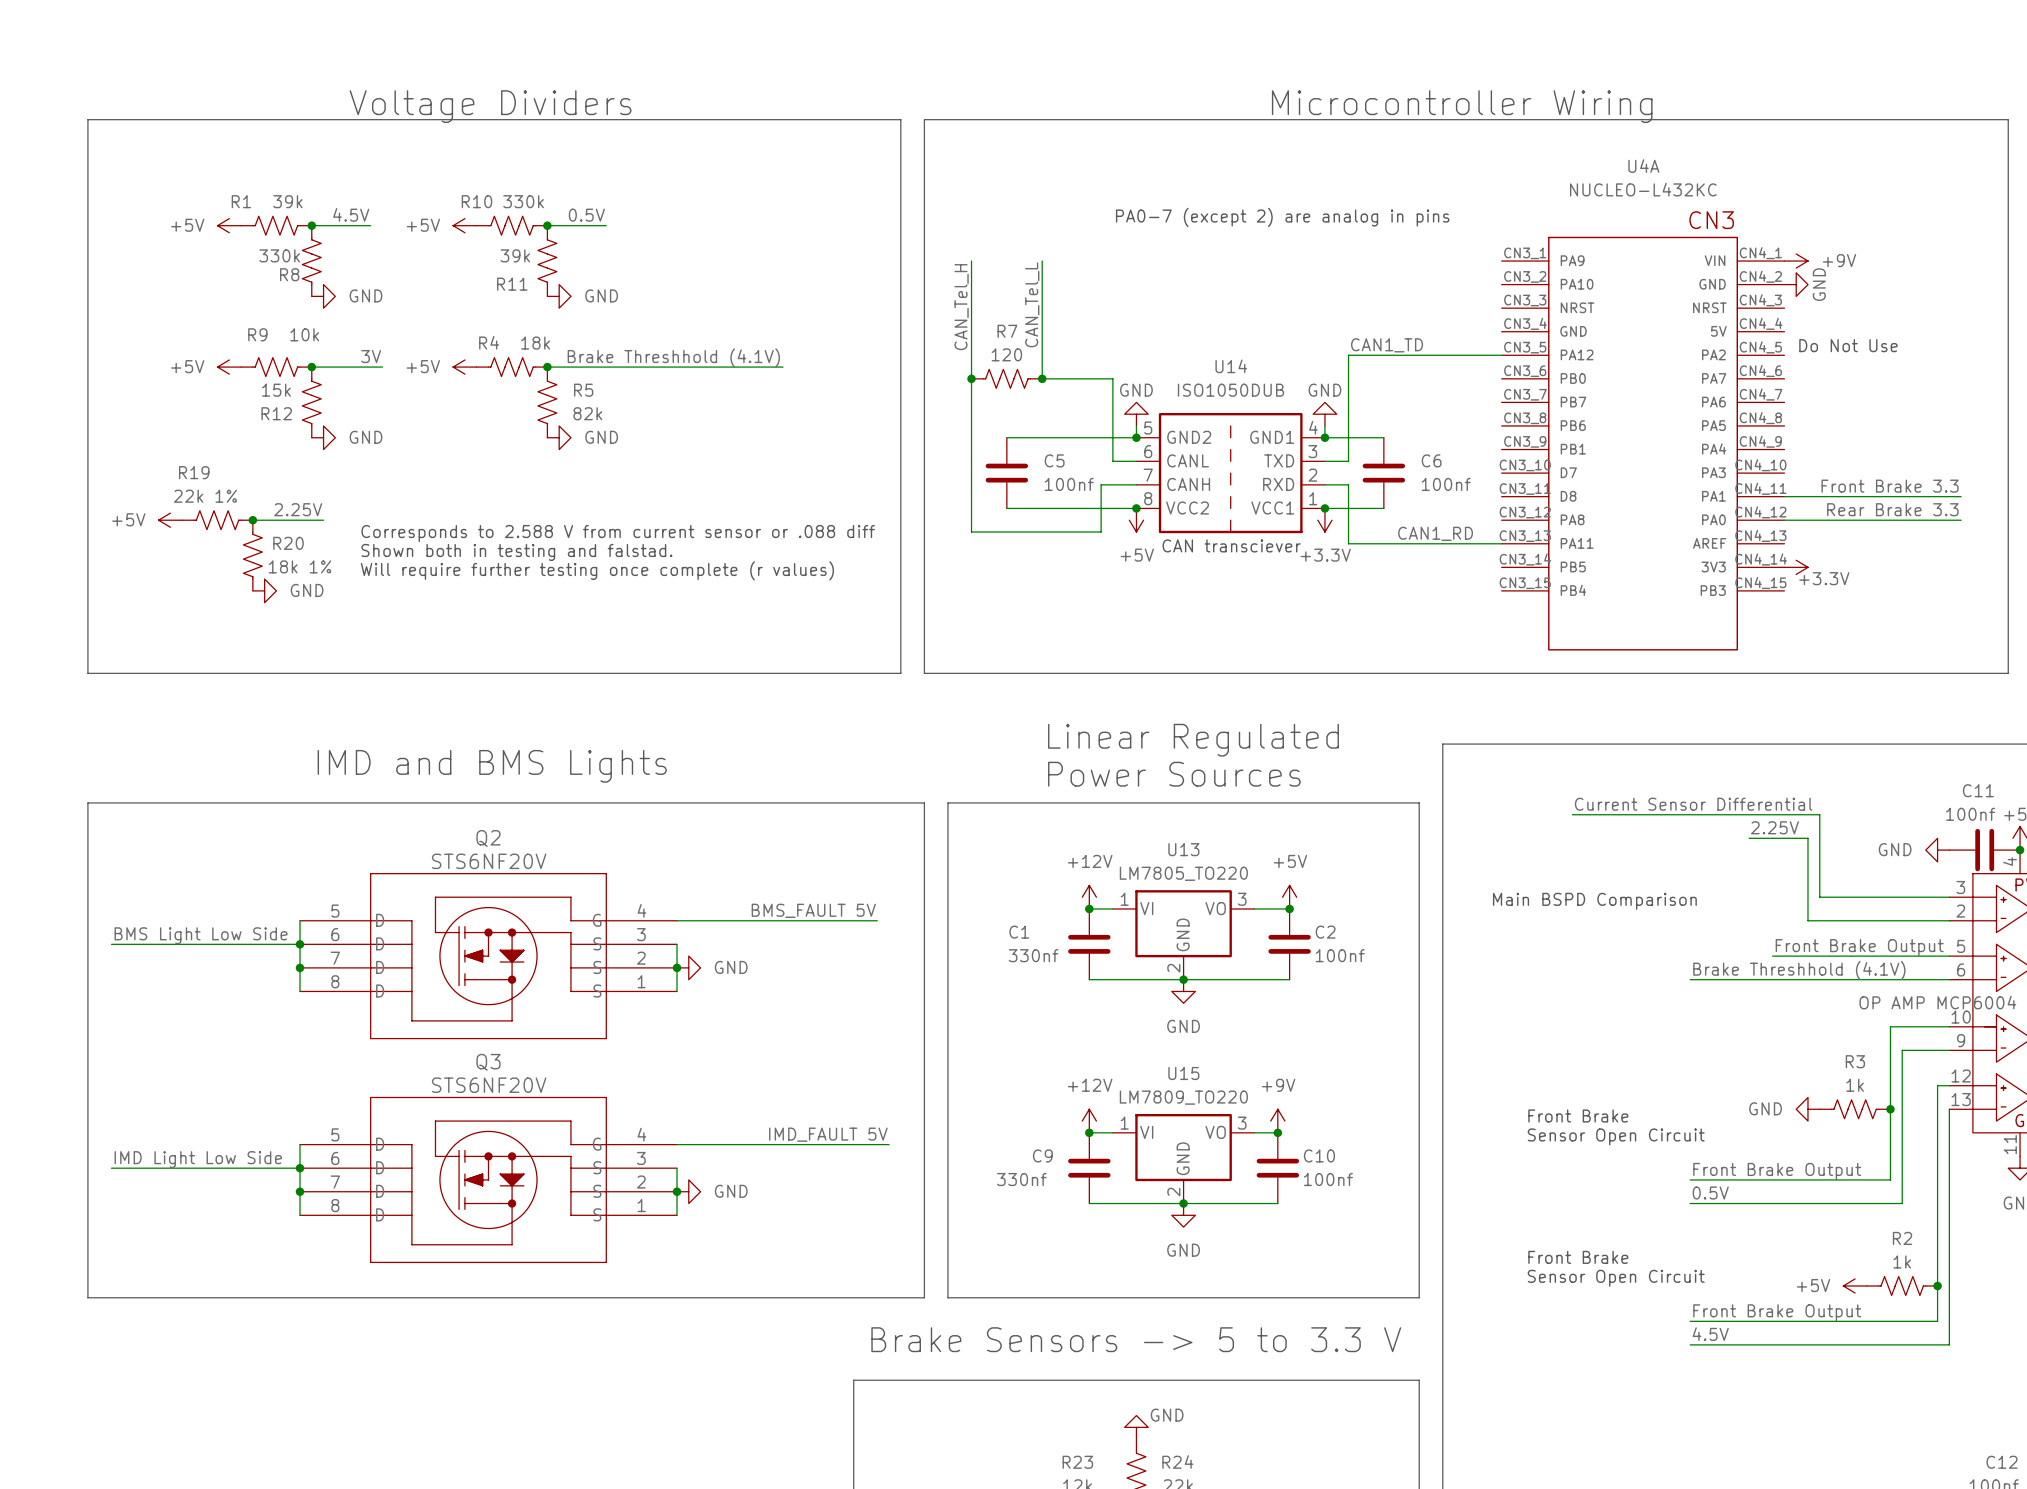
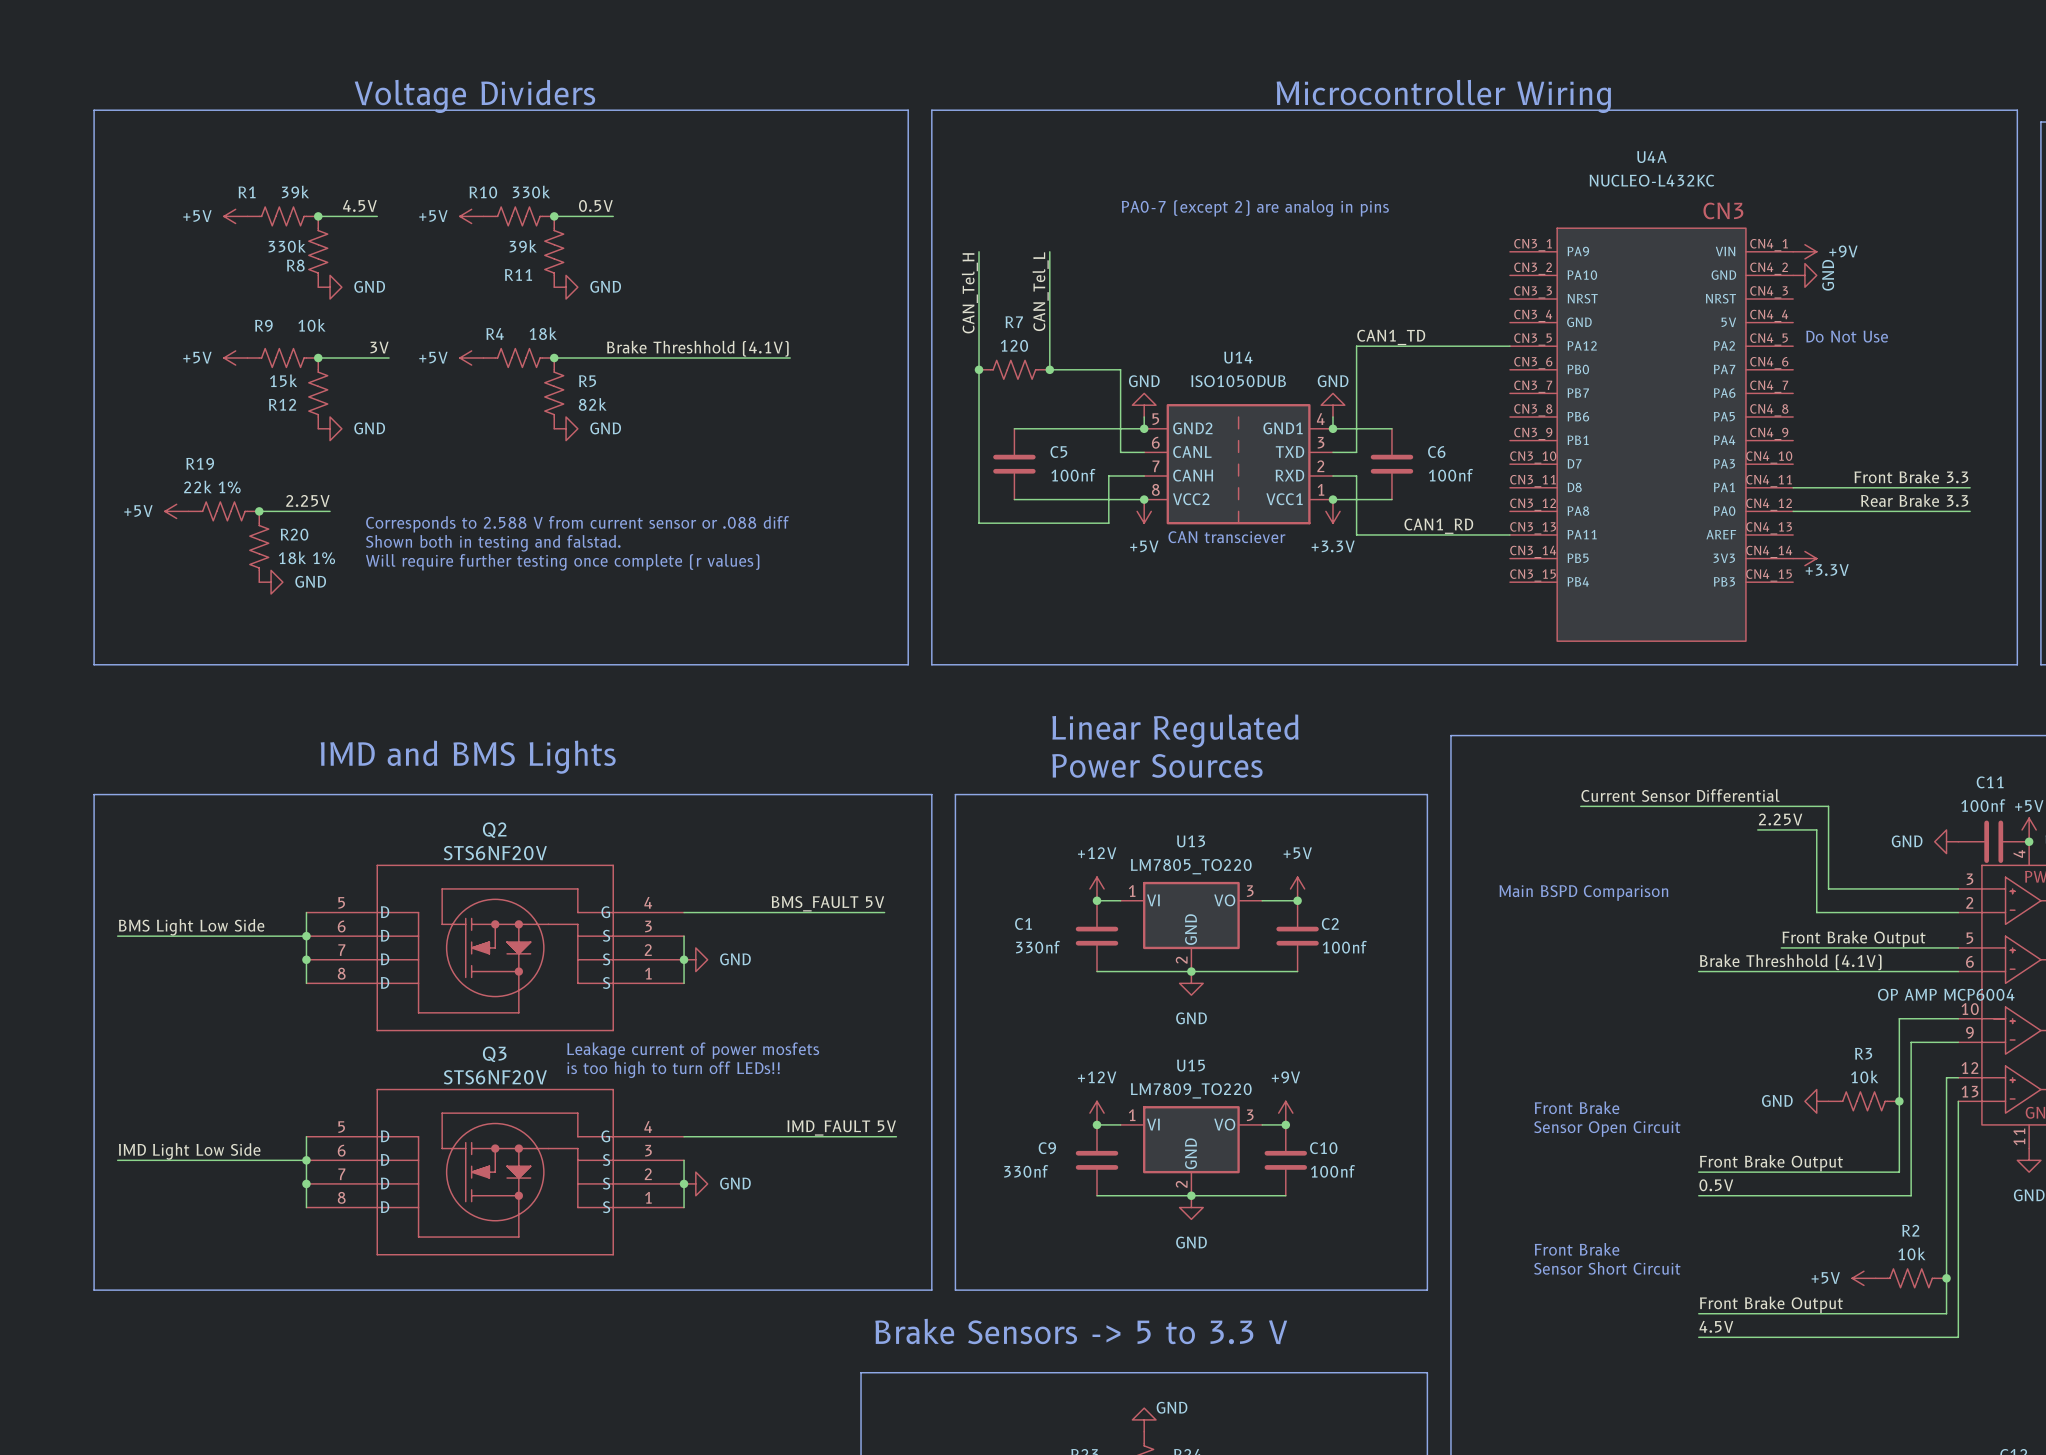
text: none -> Leakage current of power mosfets (693, 1050)
text: none -> is too high to turn off LEDs!! (673, 1069)
R3 value: 1k (1855, 1085) -> 10k (1864, 1076)
R2 value: 1k (1902, 1261) -> 10k (1911, 1253)
text: Sensor Open Circuit (1616, 1278) -> Sensor Short Circuit (1607, 1268)

